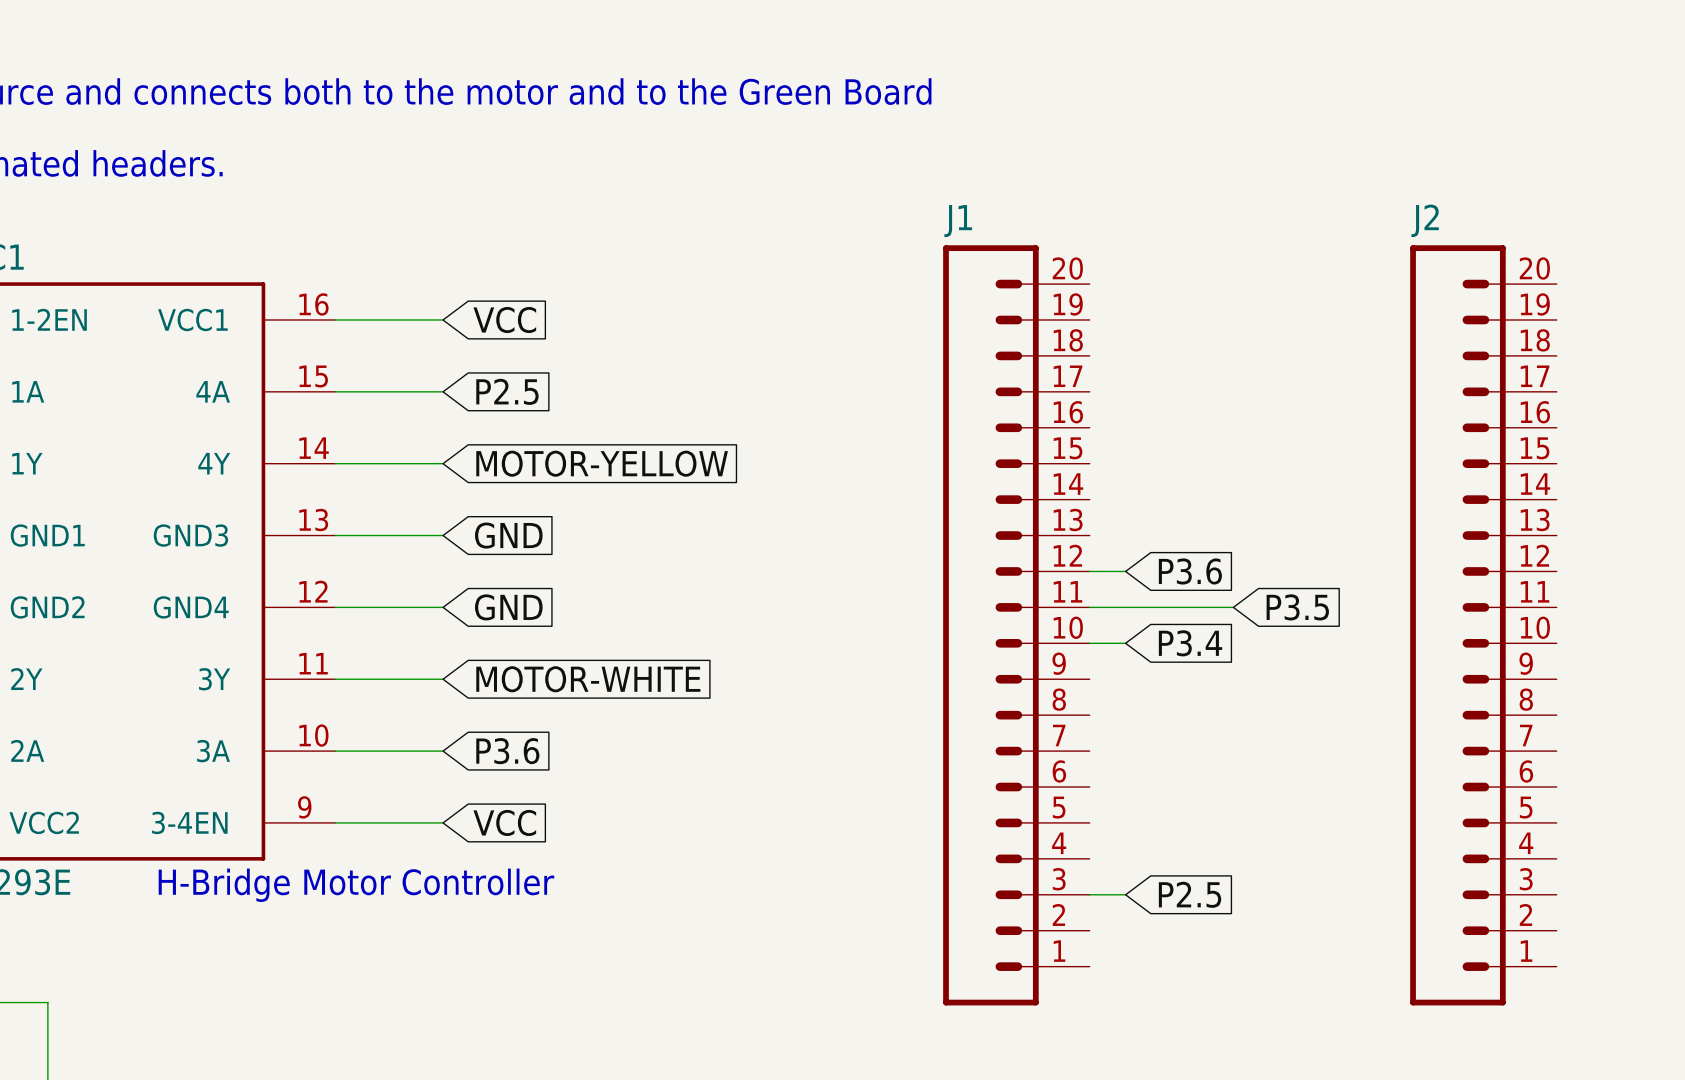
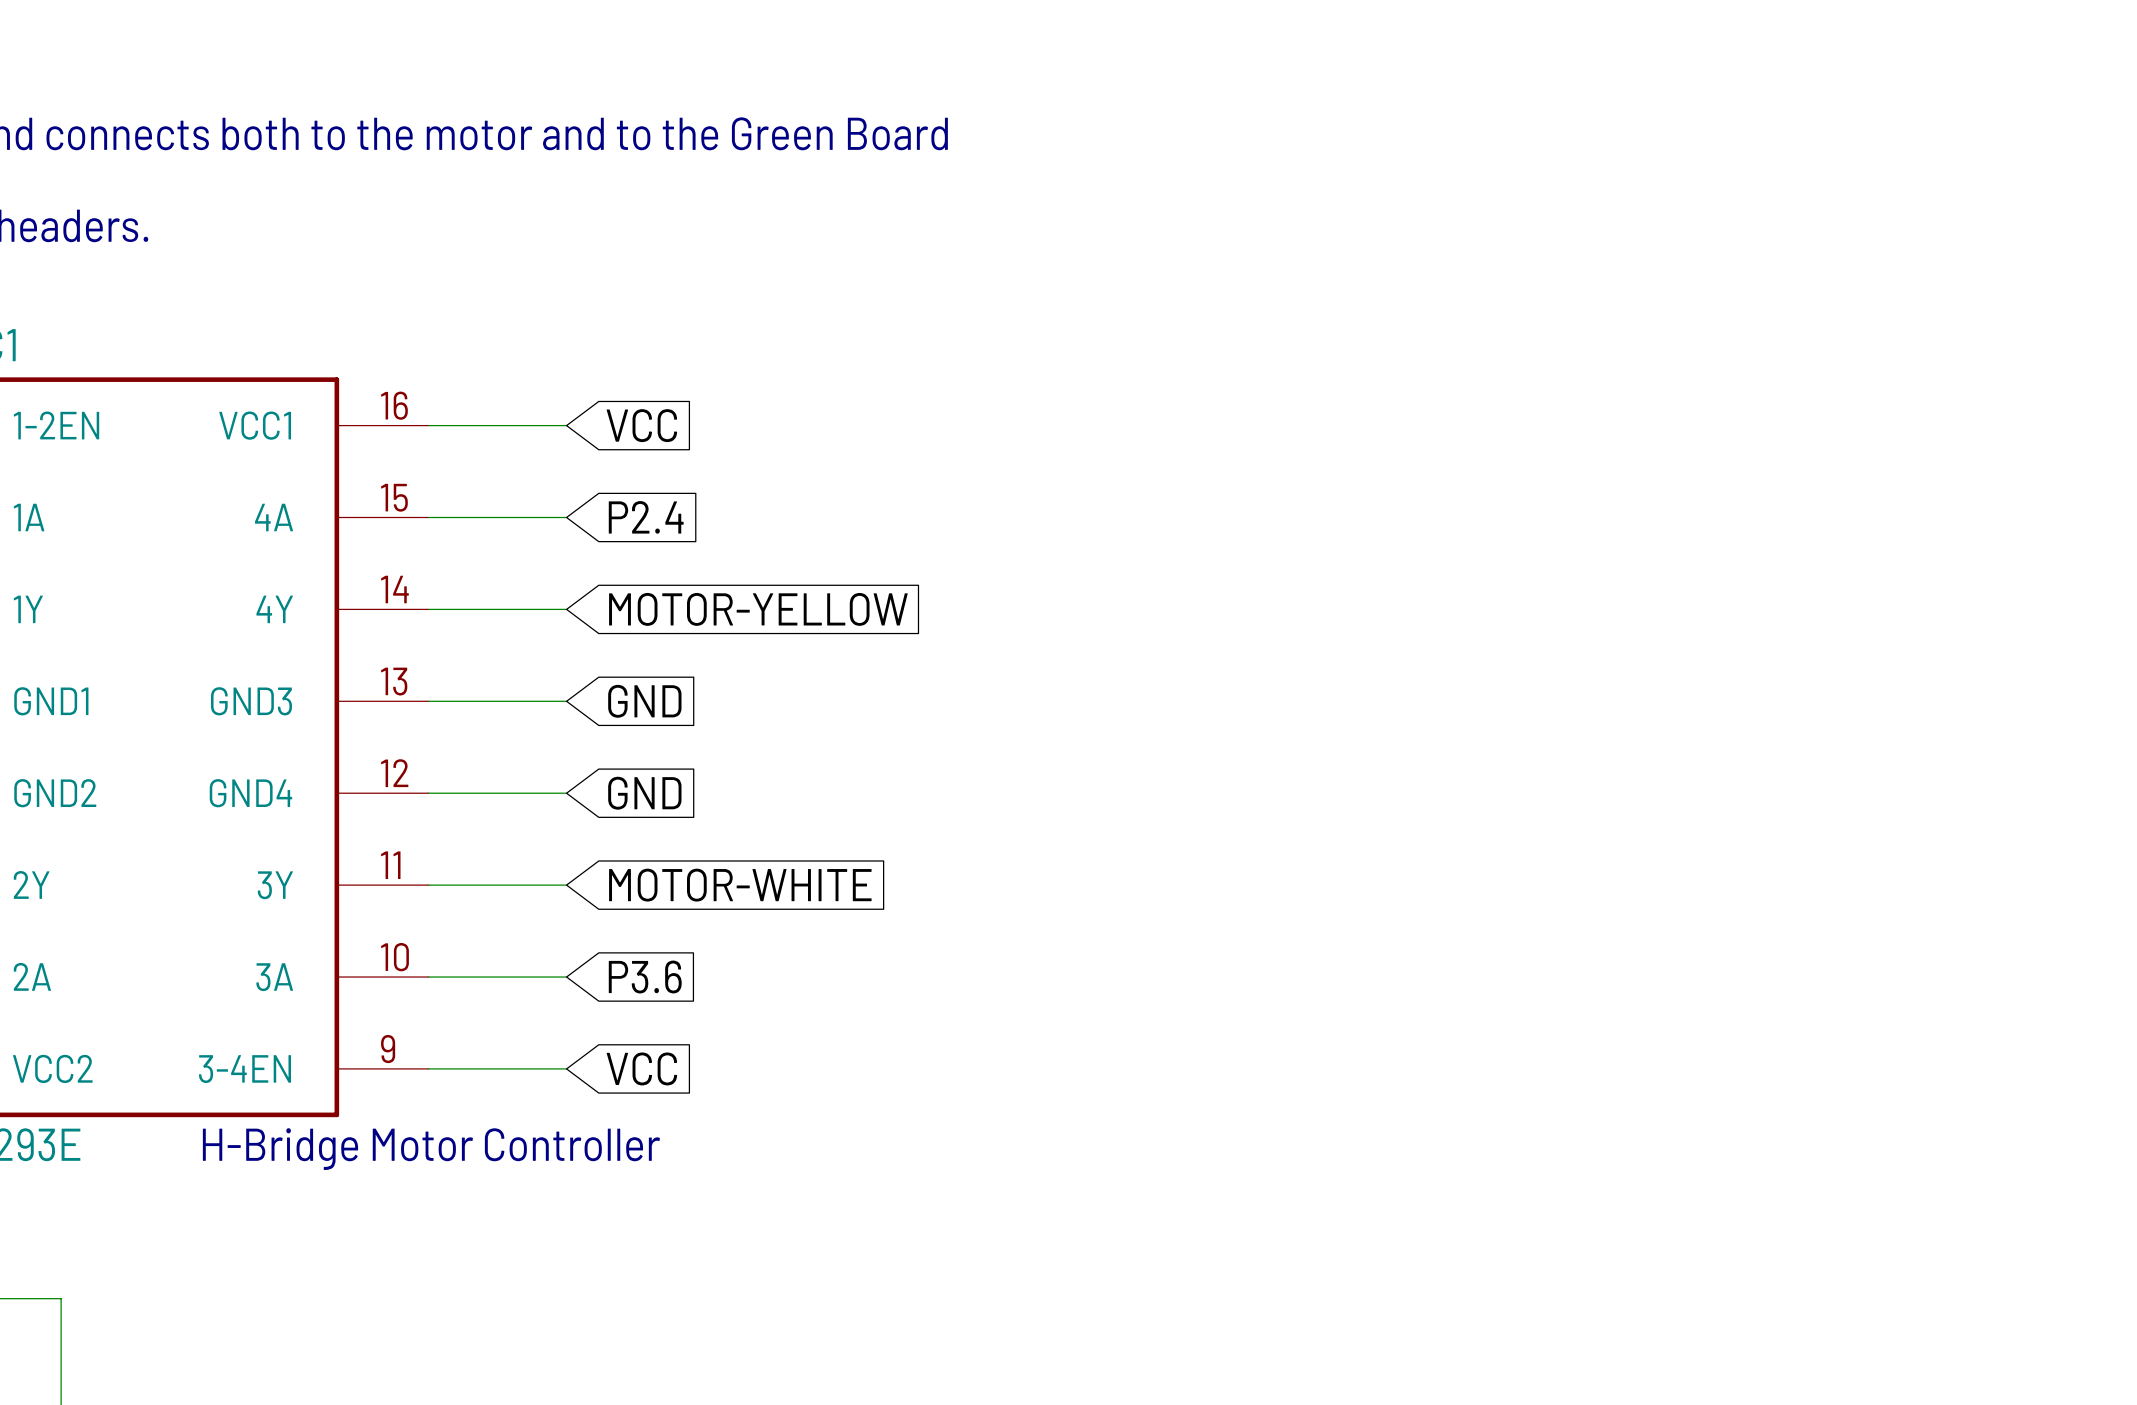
global label: P2.5 (507, 391) -> P2.4 (646, 517)
wire: (1089, 571) (1125, 571) -> none
global label: P3.6 (1190, 571) -> none
wire: (1089, 607) (1233, 607) -> none
global label: P3.5 (1297, 607) -> none
J1: (1016, 625) -> none
J2: (1483, 625) -> none
wire: (1089, 643) (1125, 643) -> none
global label: P3.4 (1190, 643) -> none
wire: (1089, 894) (1125, 894) -> none
global label: P2.5 (1190, 894) -> none

